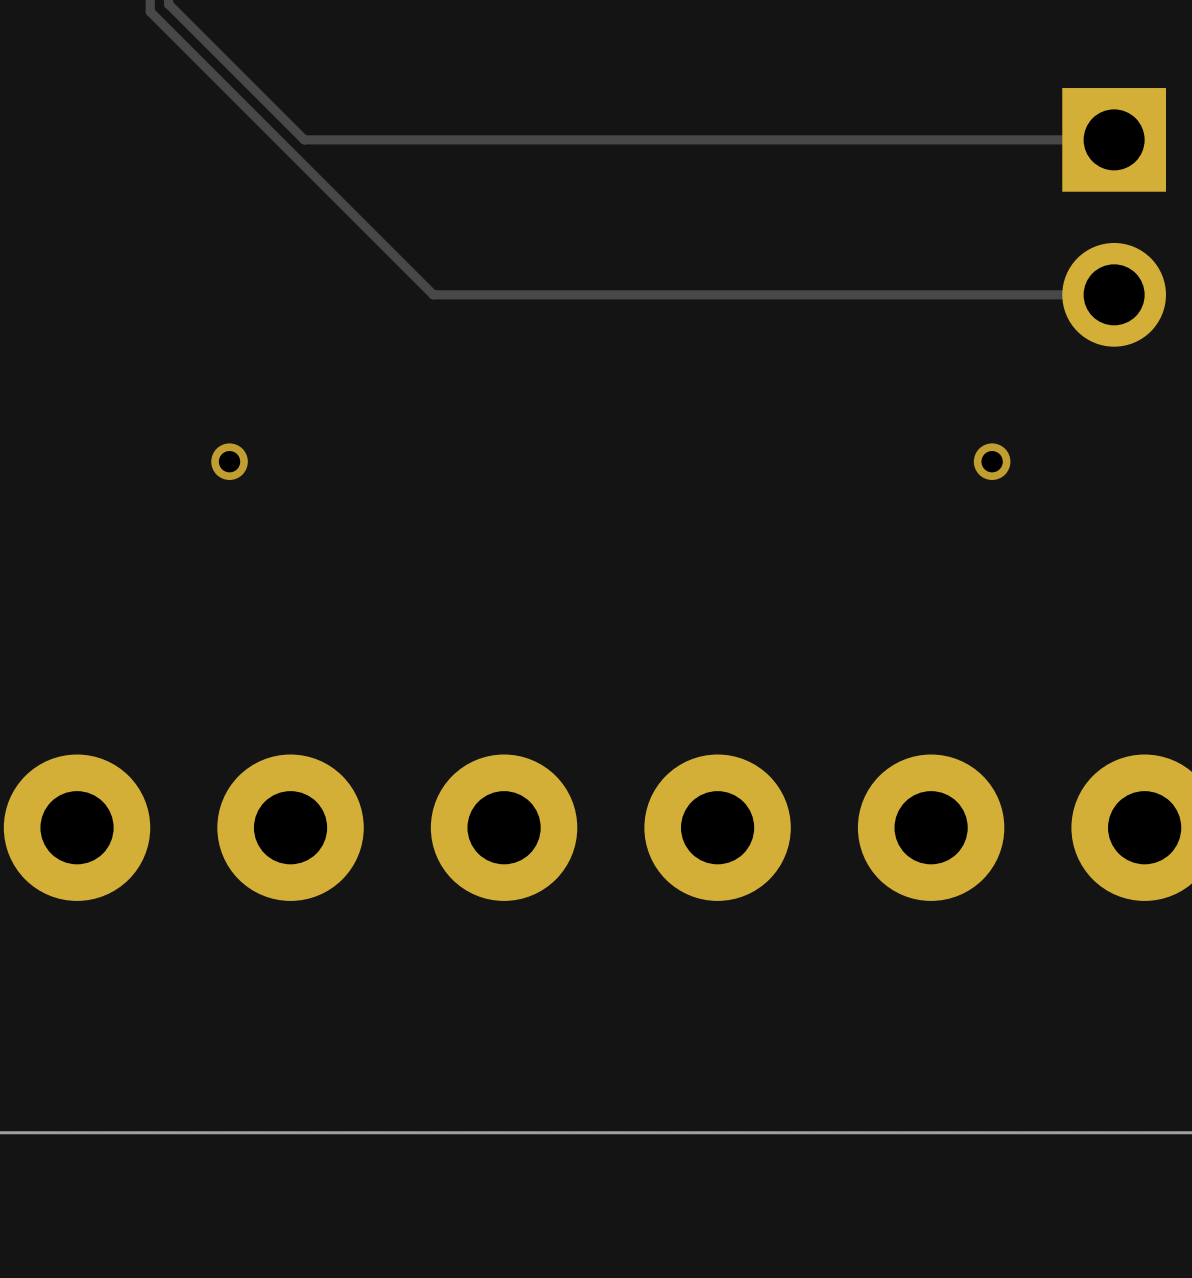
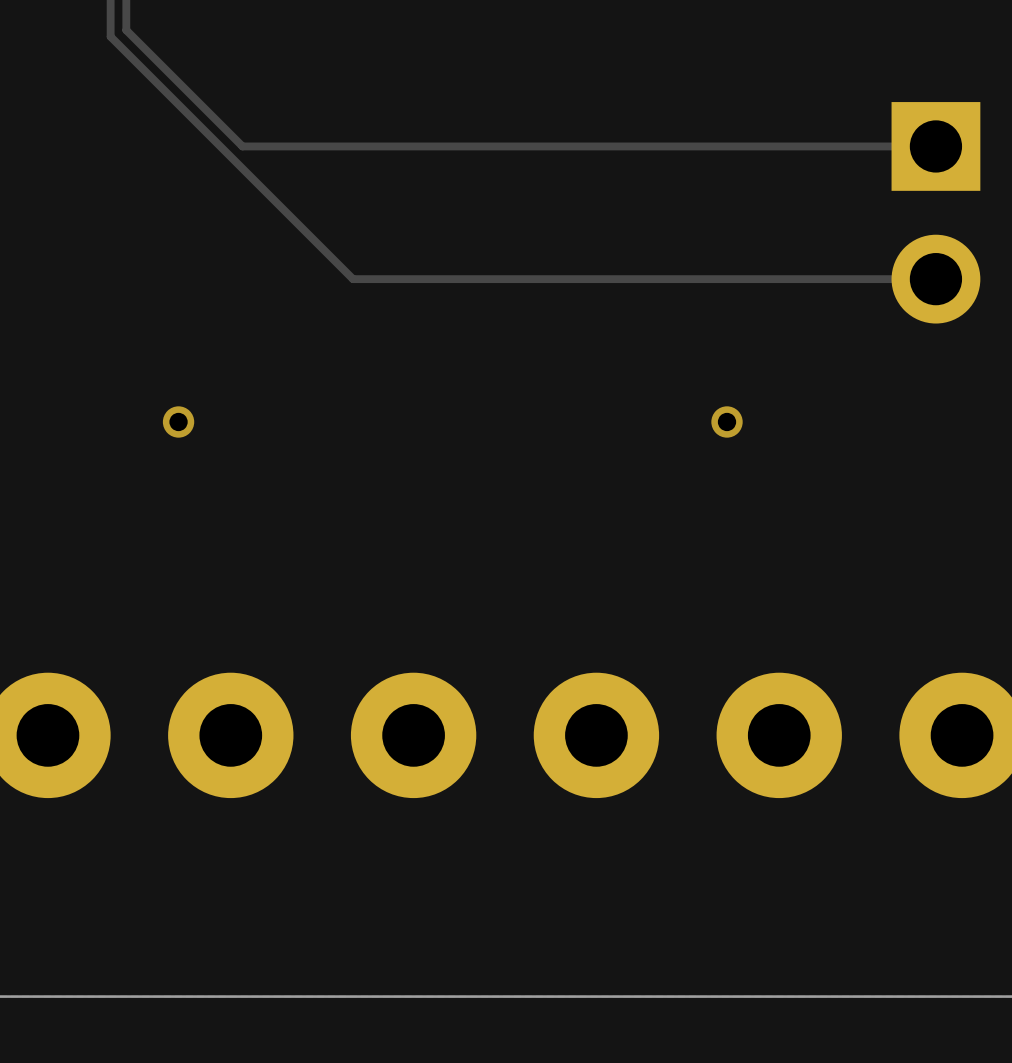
via position: (992, 461) -> (727, 421)

